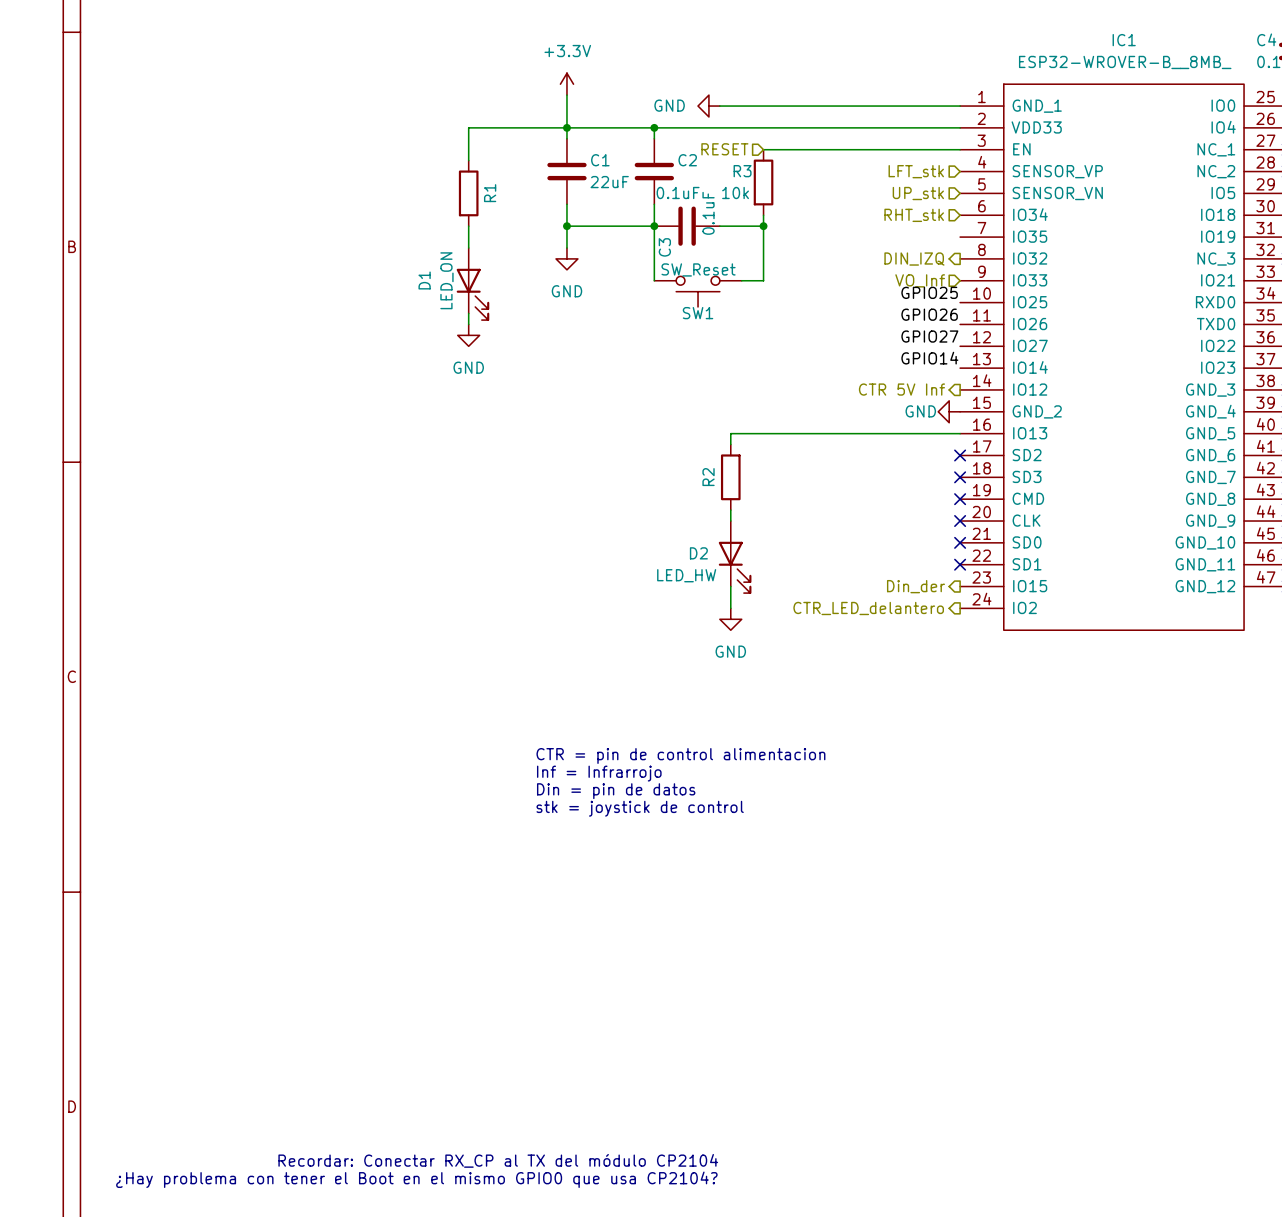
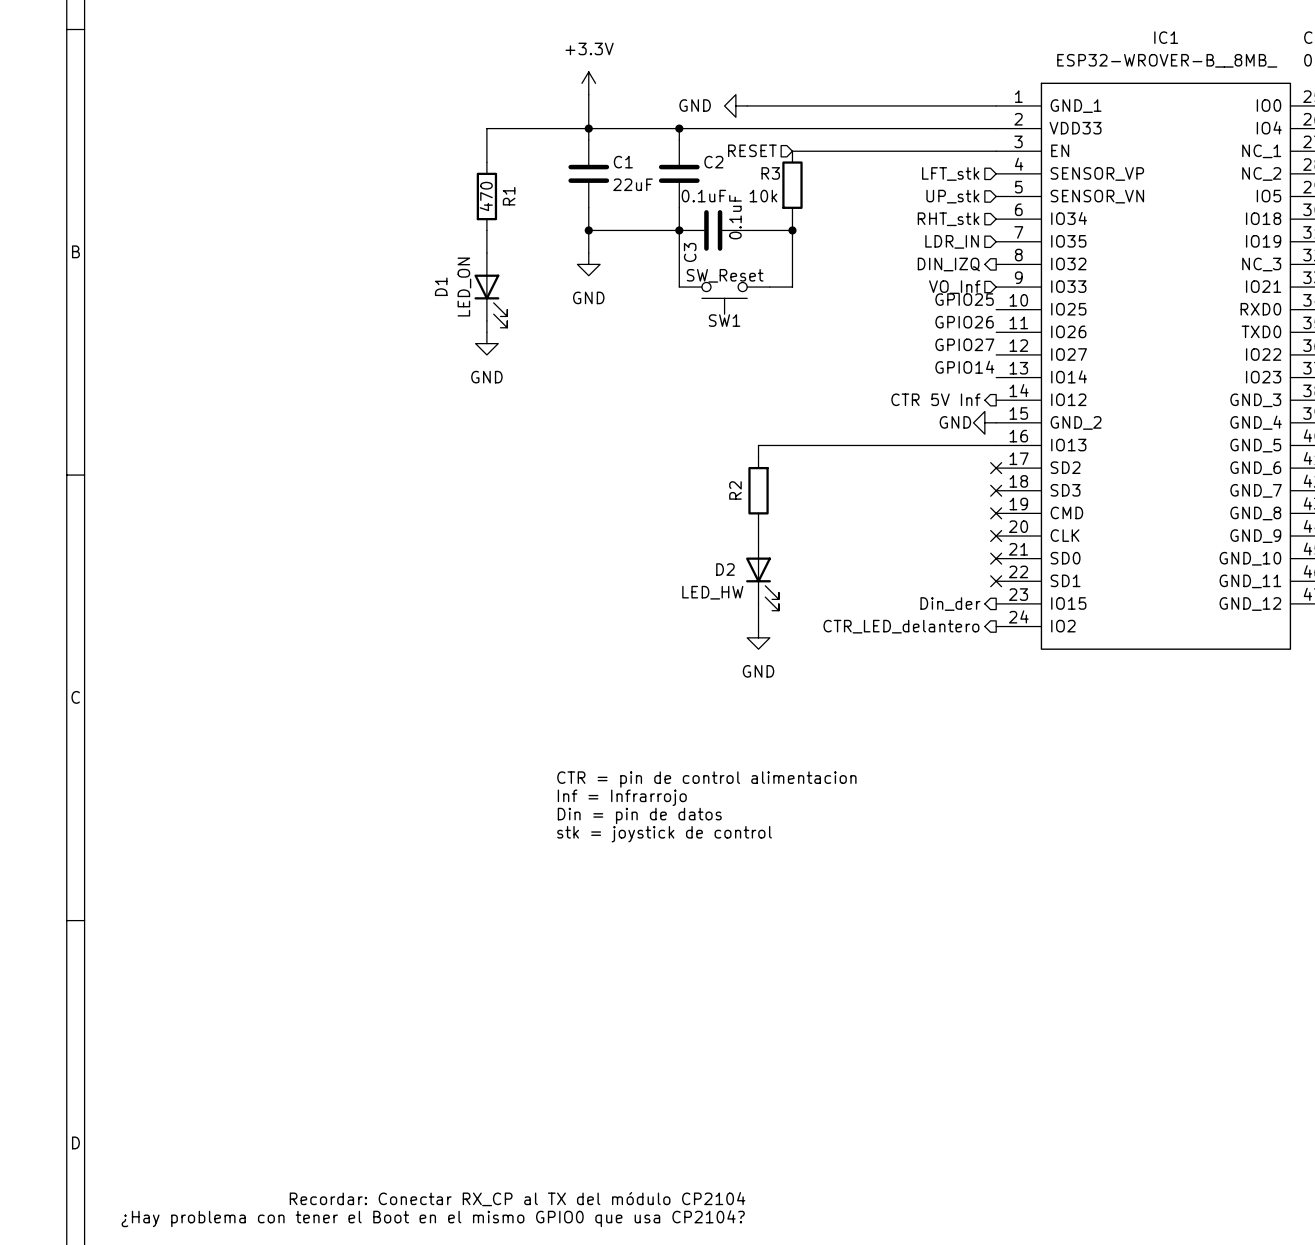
R1 value: none -> 470 (486, 196)
hierarchical label: none -> LDR_IN (952, 241)

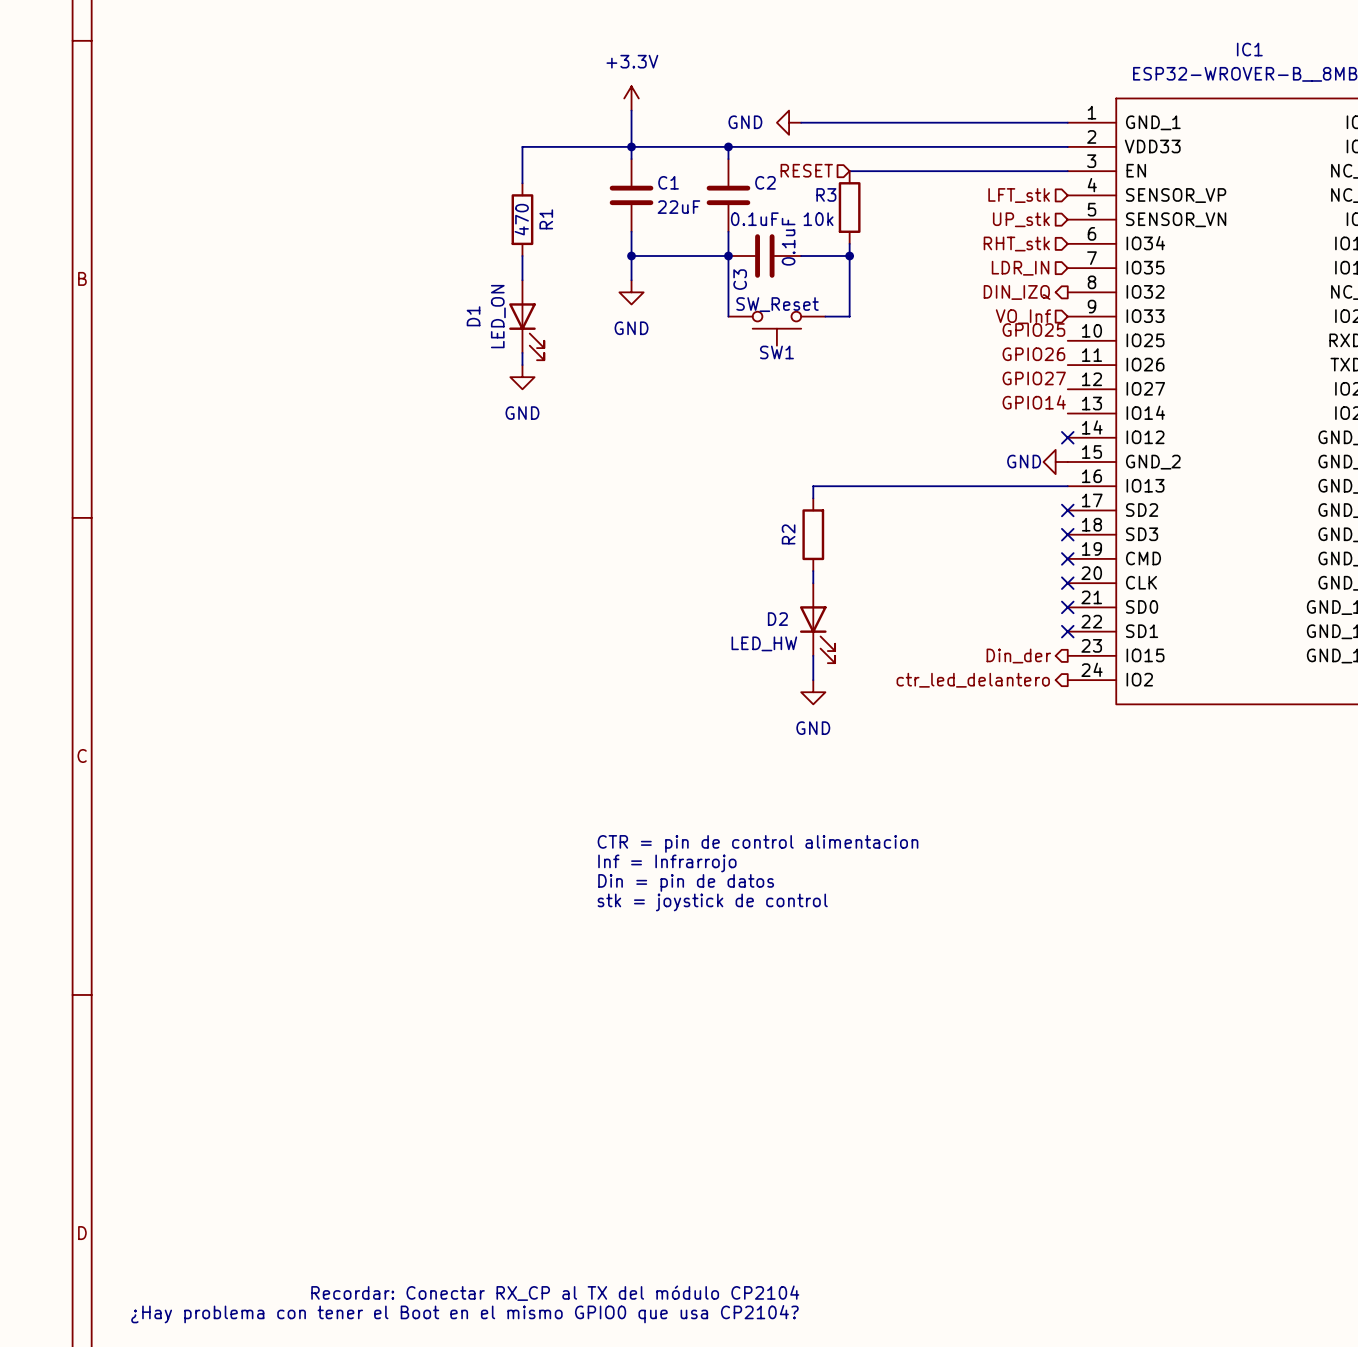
hierarchical label: CTR 5V Inf (935, 399) -> none
no-connect mark: none -> (1067, 437)
hierarchical label: CTR_LED_delantero (901, 626) -> ctr_led_delantero (973, 680)

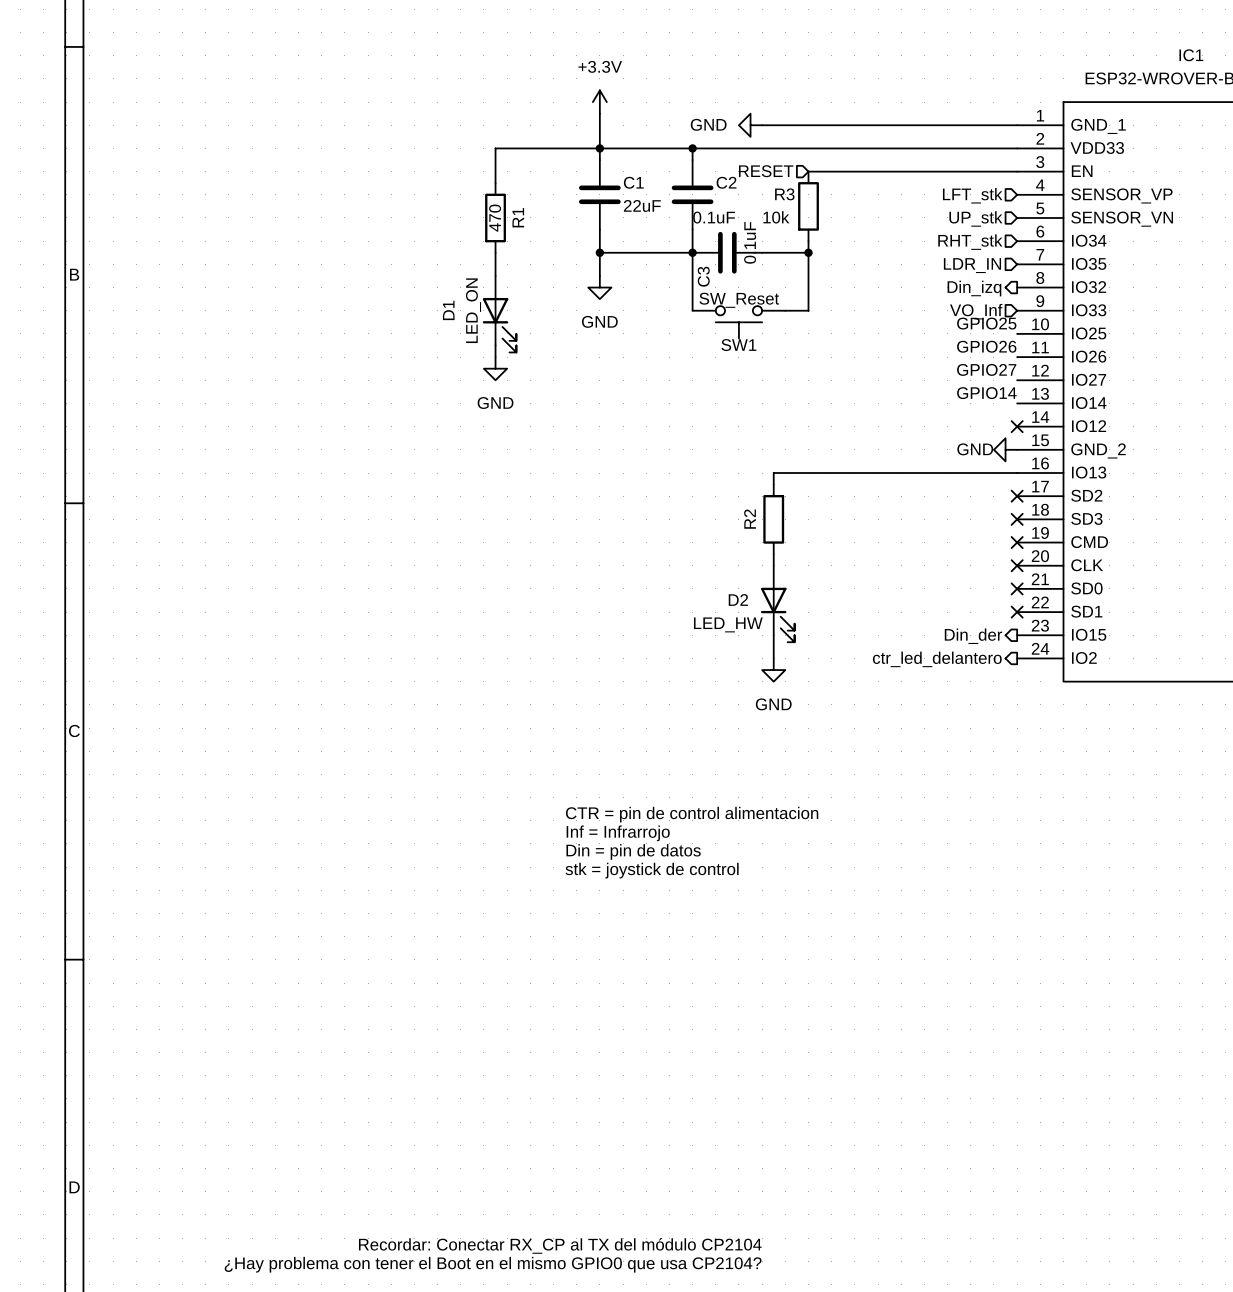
hierarchical label: DIN_IZQ (1017, 292) -> Din_izq (974, 288)

